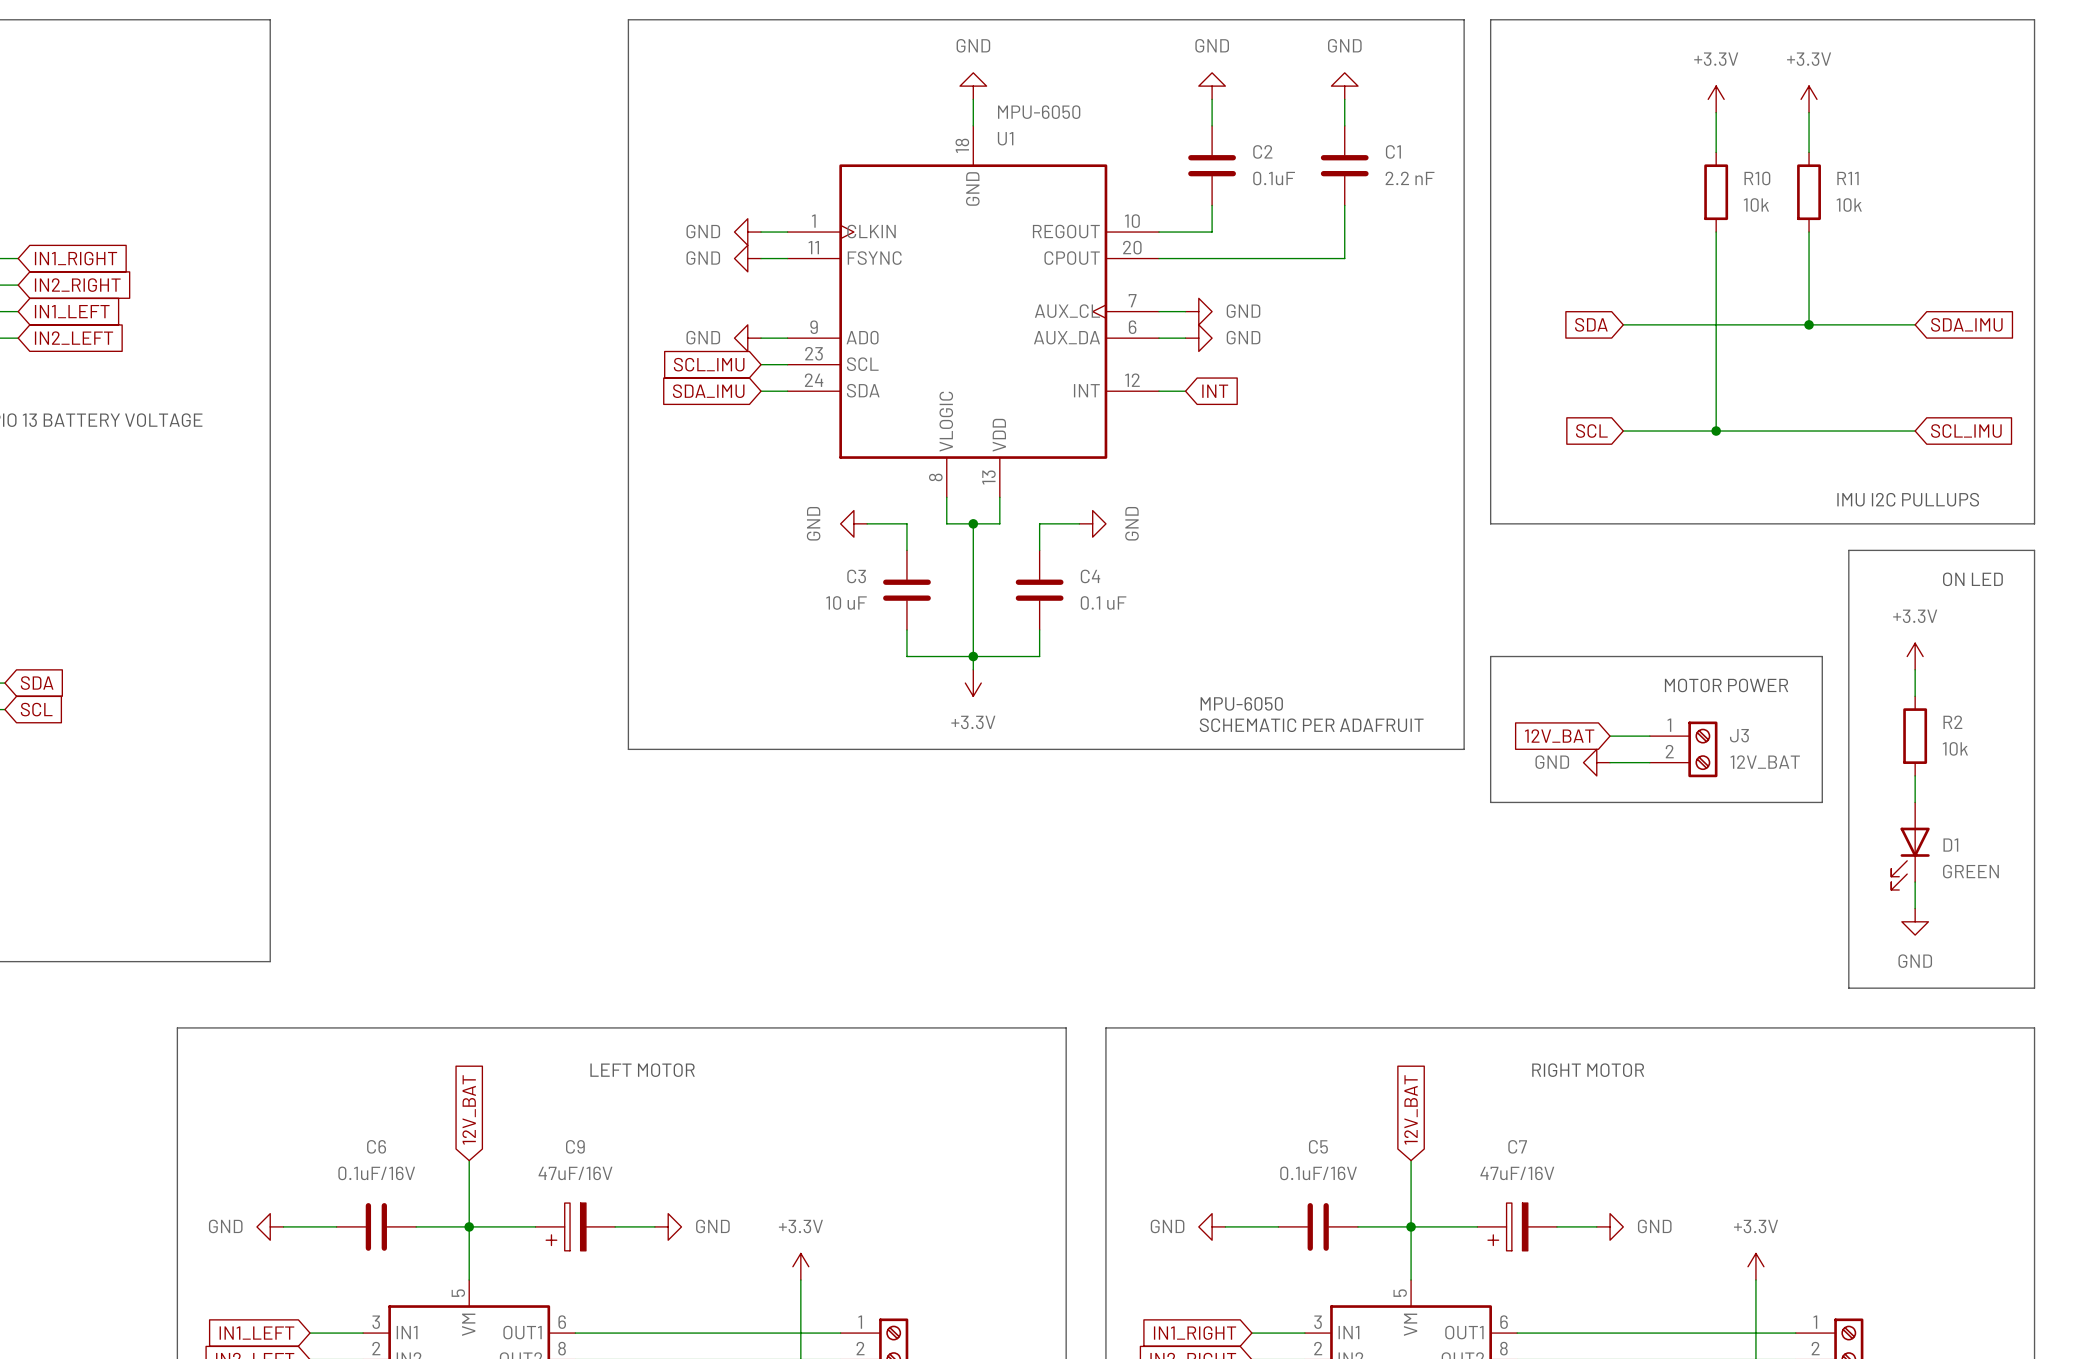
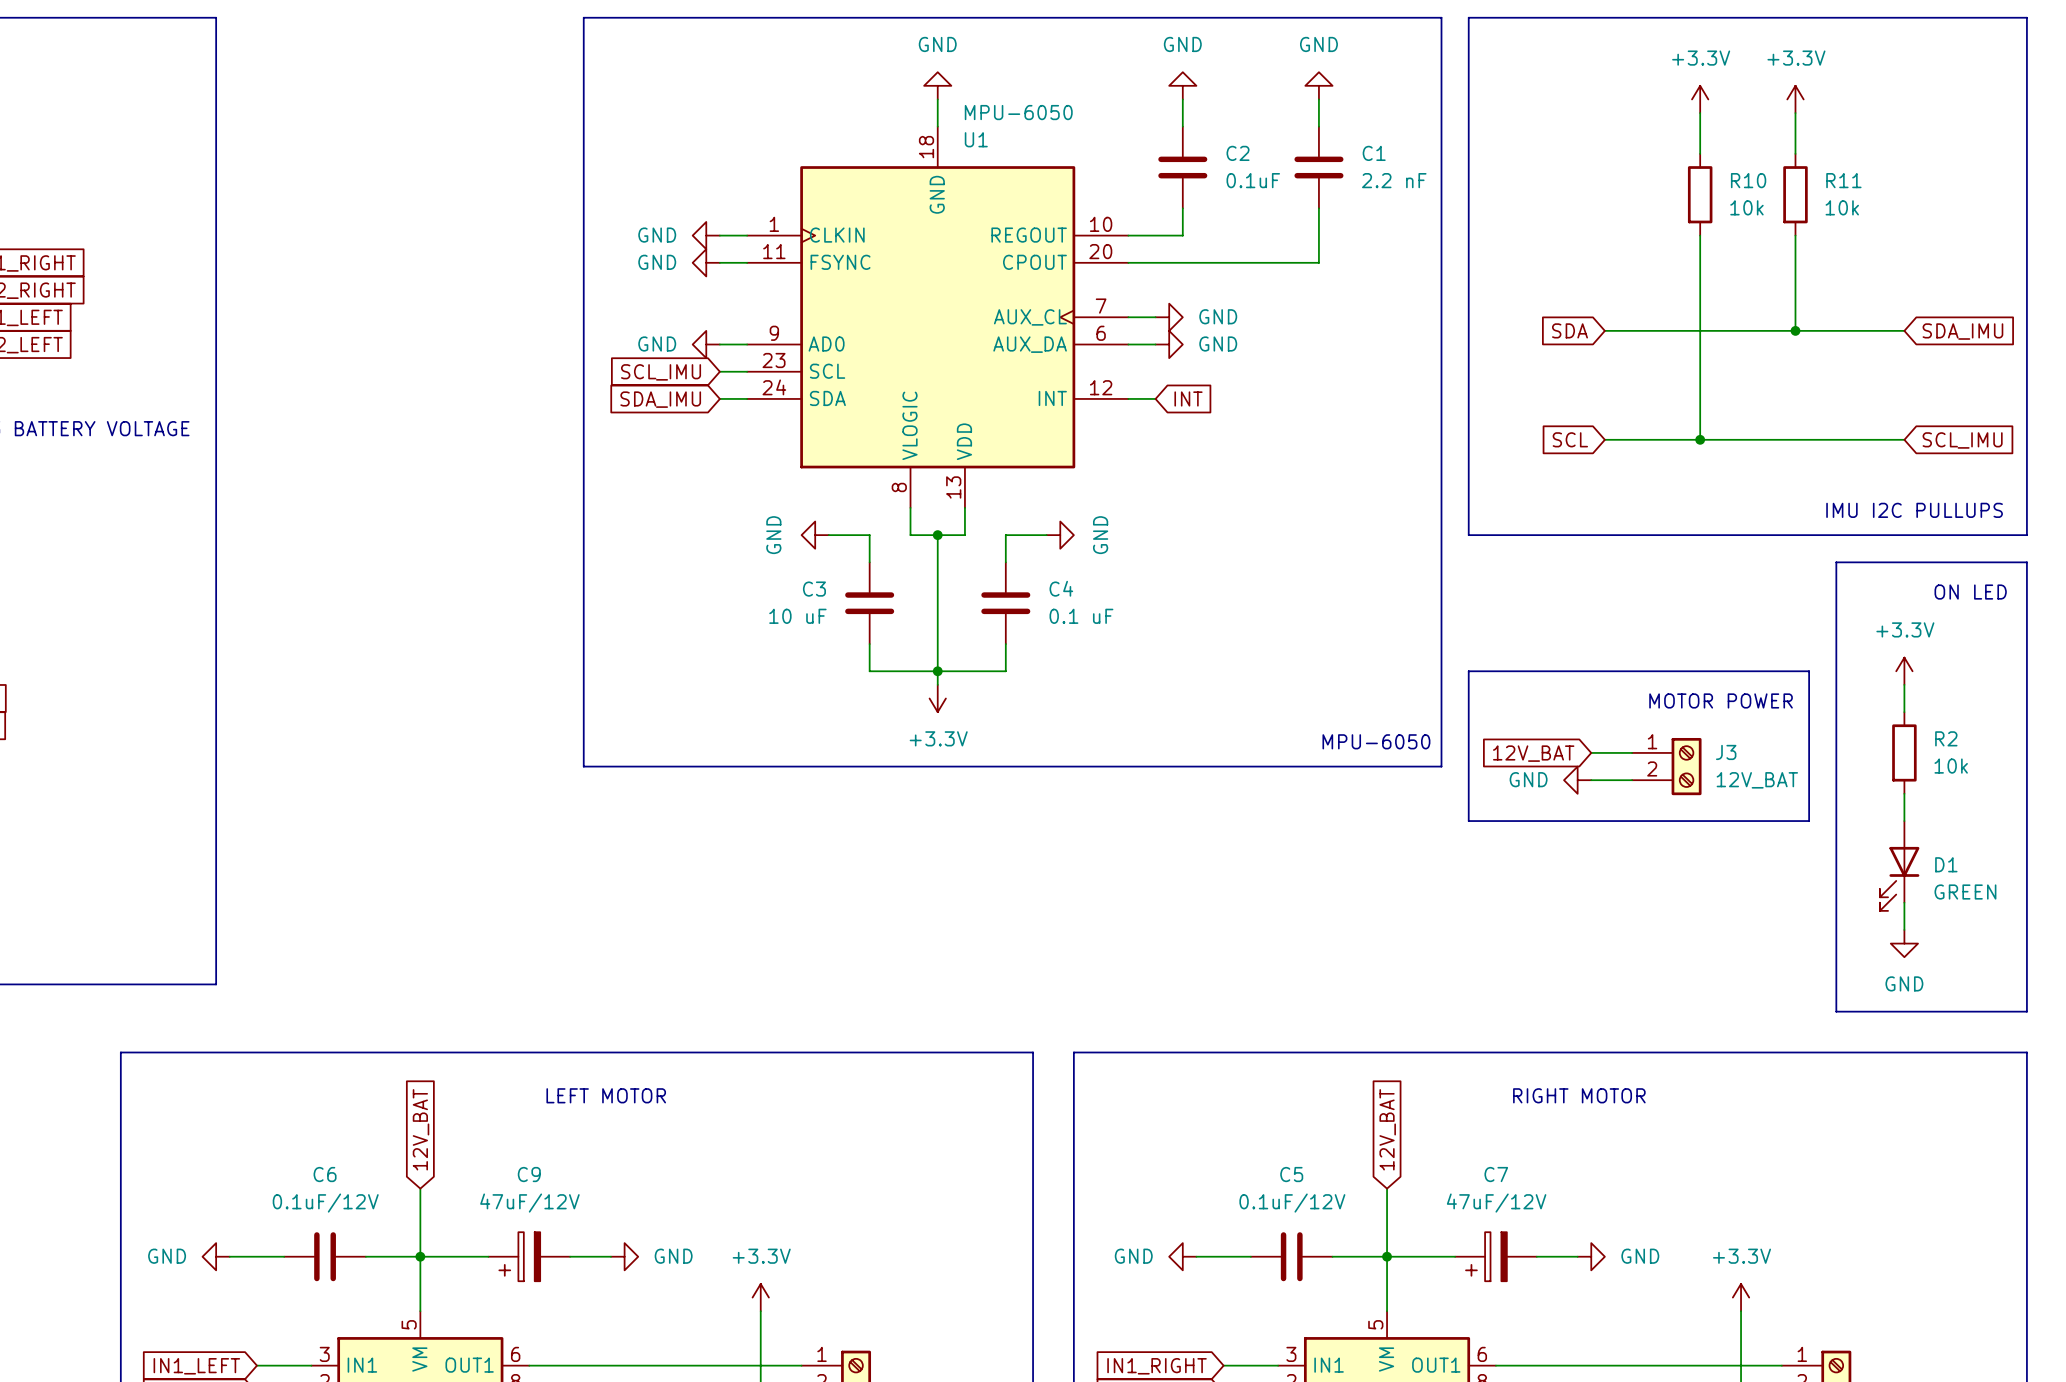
text position: MPU-6050 (1241, 703) -> MPU-6050 (1376, 741)
text: SCHEMATIC PER ADAFRUIT (1311, 725) -> none
C6 value: 0.1uF/16V (376, 1173) -> 0.1uF/12V (325, 1203)
C9 value: 47uF/16V (575, 1173) -> 47uF/12V (529, 1203)
C5 value: 0.1uF/16V (1318, 1173) -> 0.1uF/12V (1292, 1203)
C7 value: 47uF/16V (1517, 1173) -> 47uF/12V (1496, 1203)

